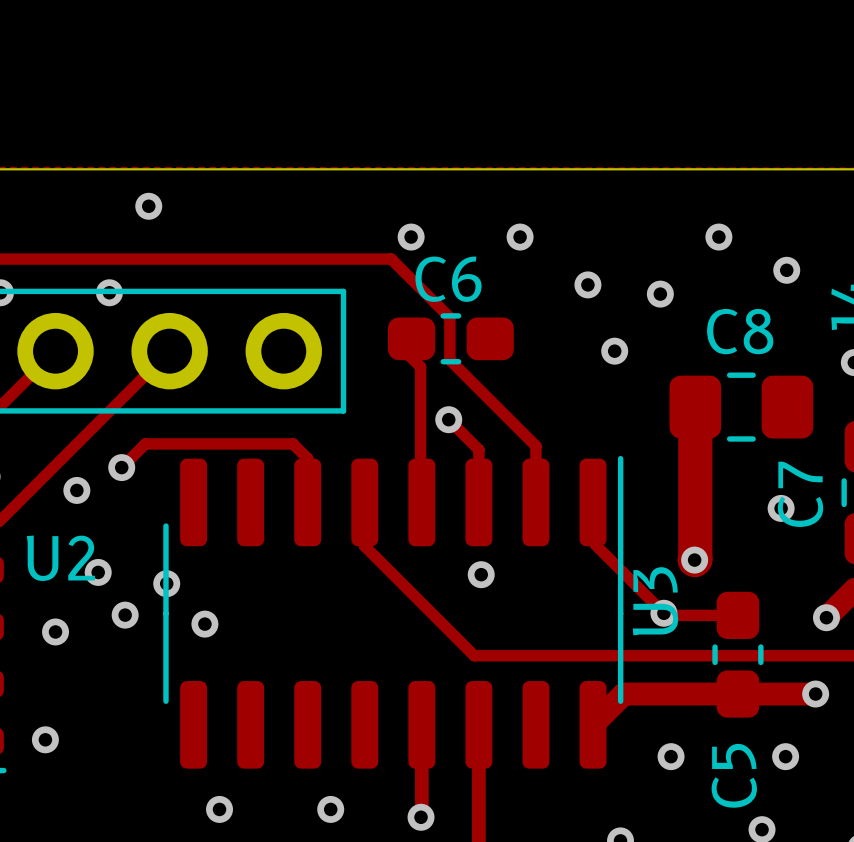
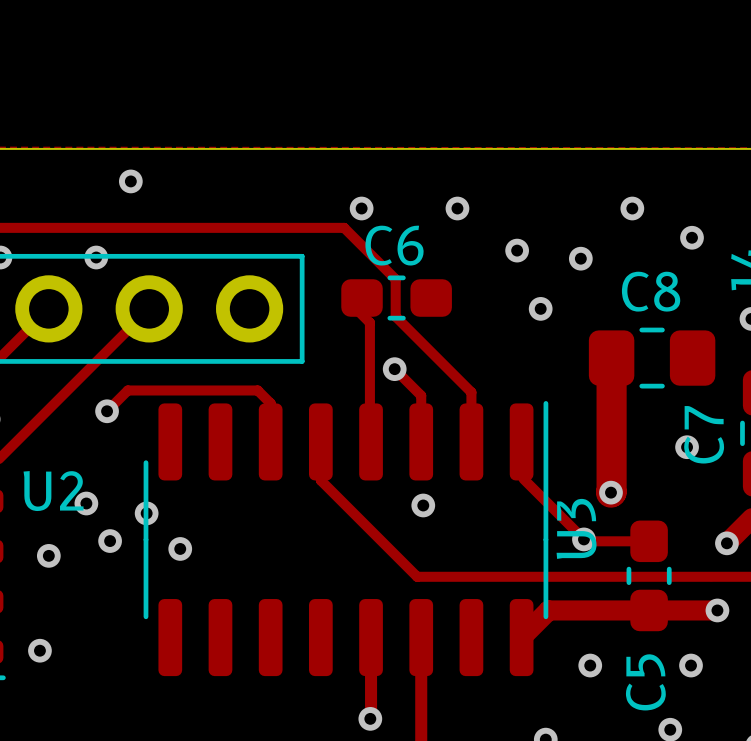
via: (76, 490) -> none
via: (219, 809) -> none
via: (330, 809) -> none

